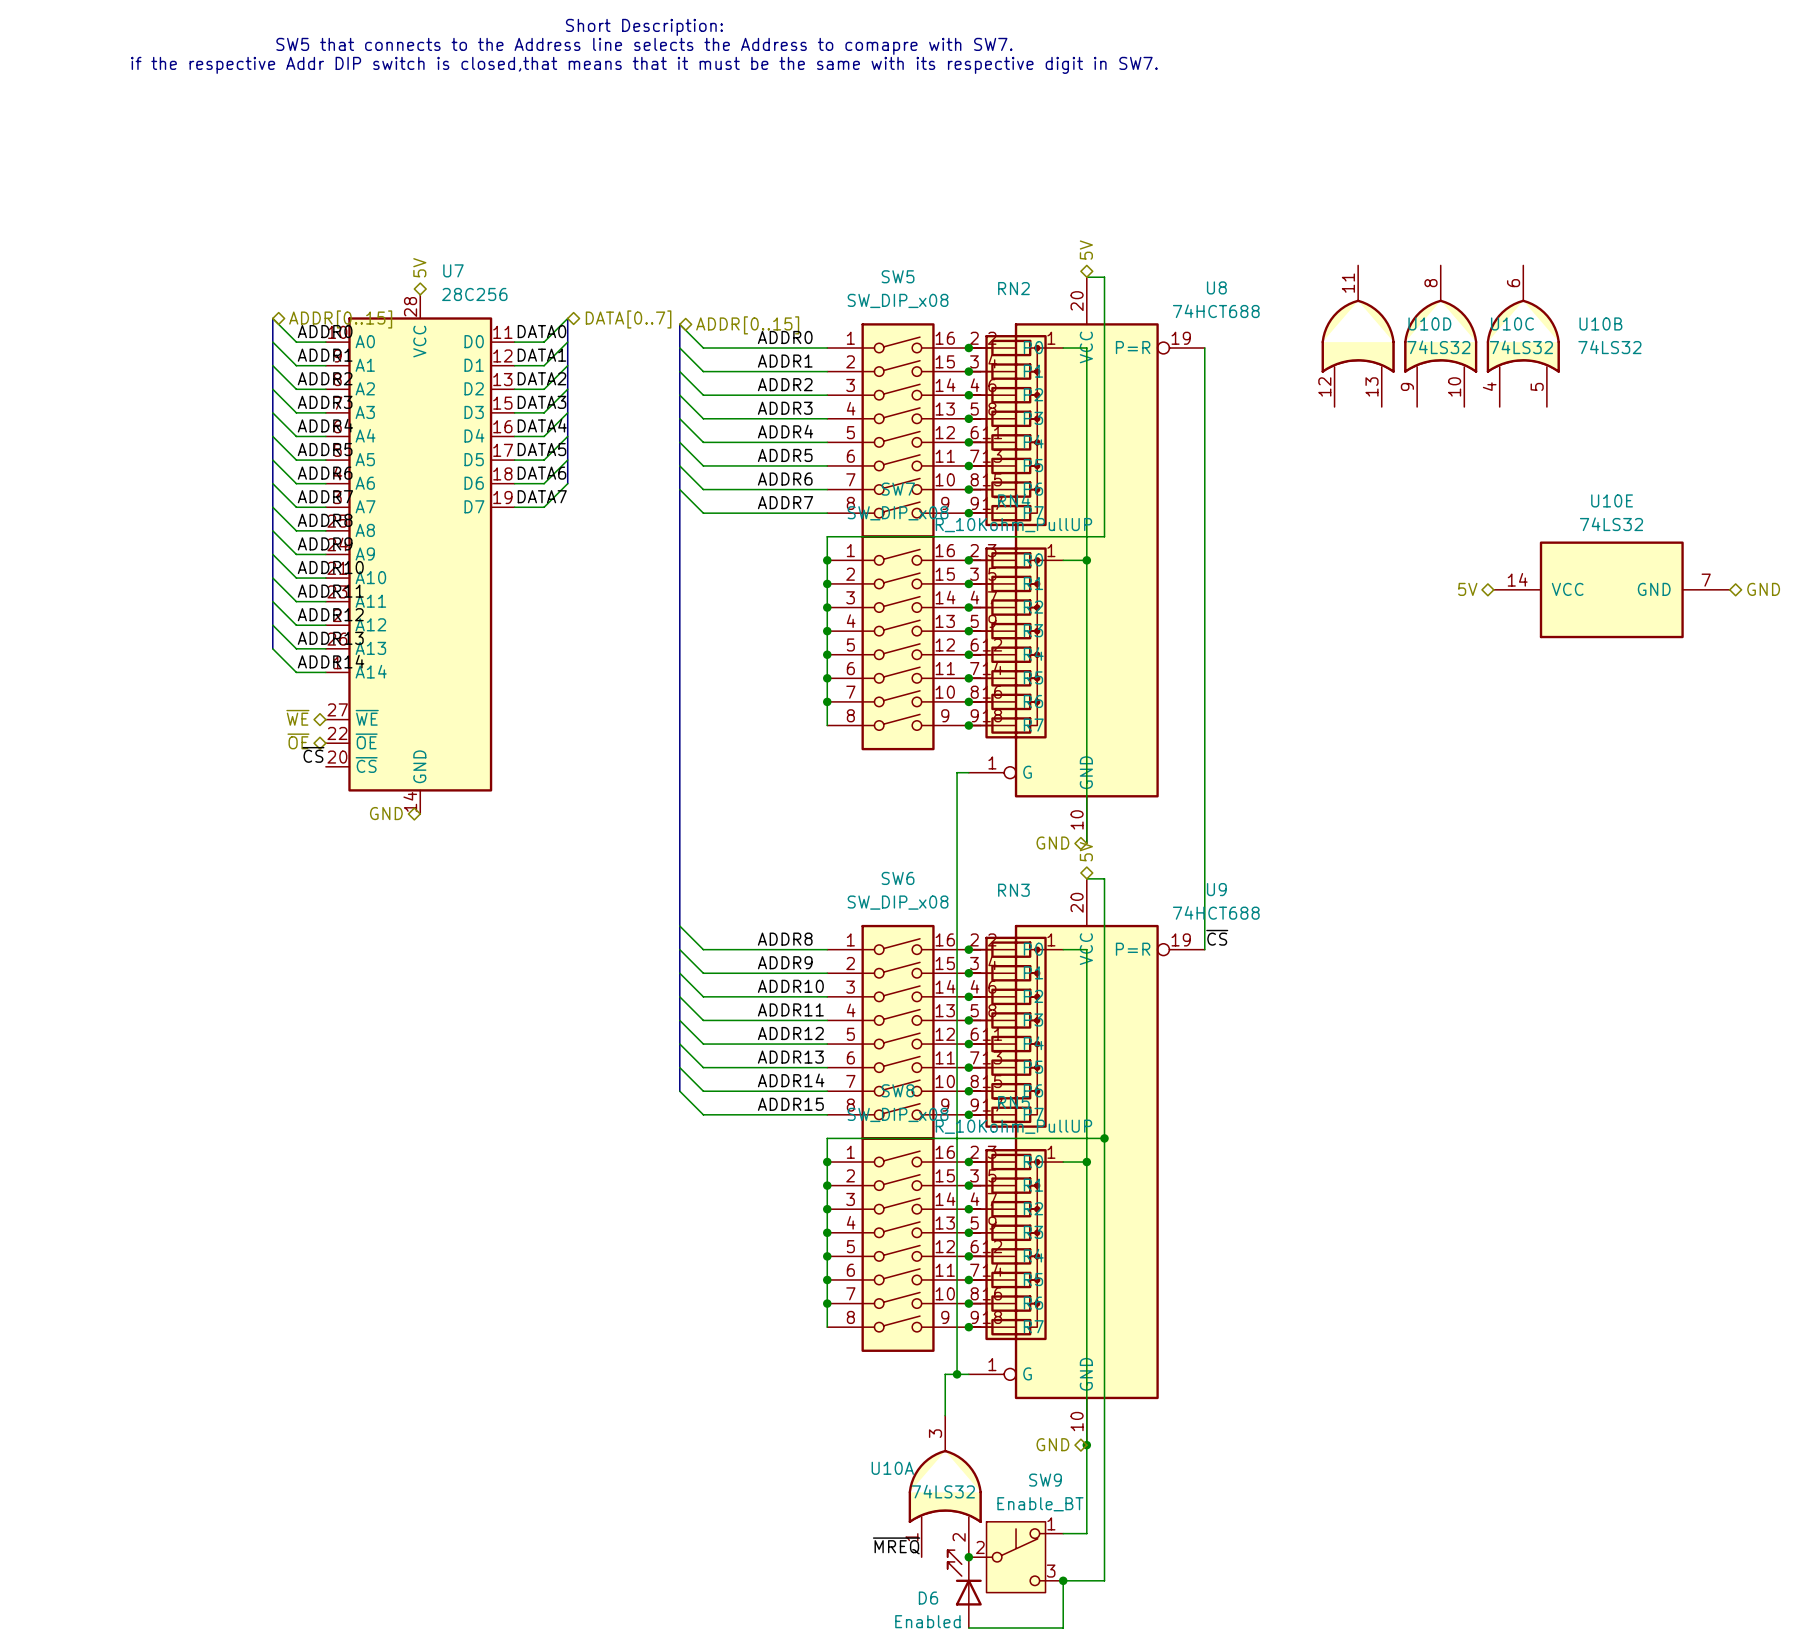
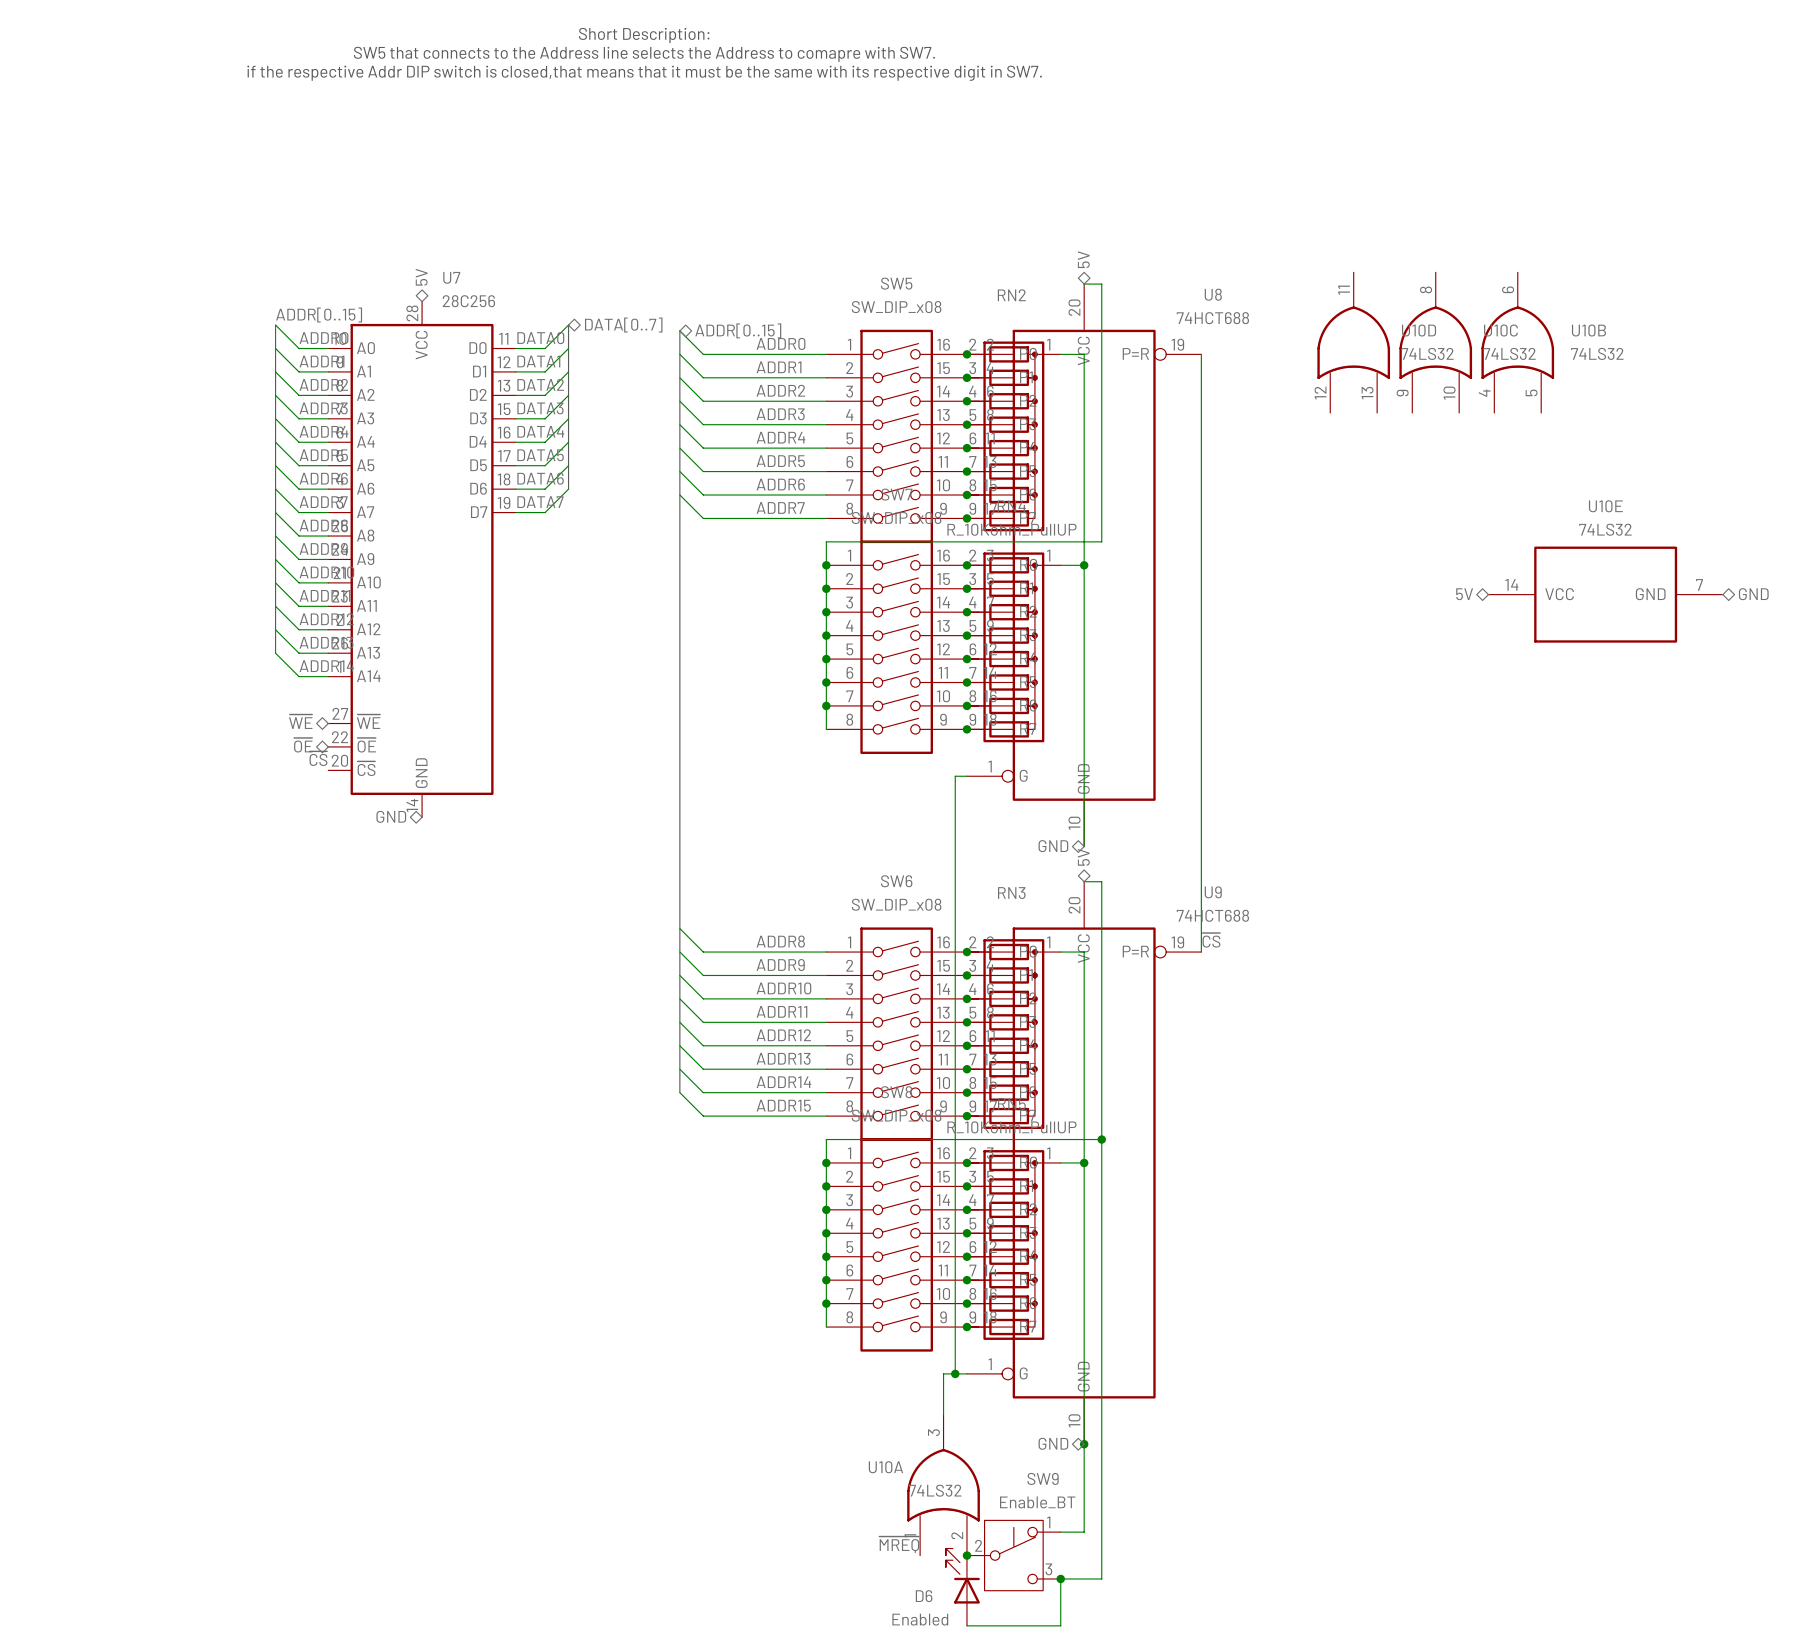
label: none -> ADDR[0..15] (319, 315)
hierarchical label: ADDR[0..15] (340, 319) -> none

